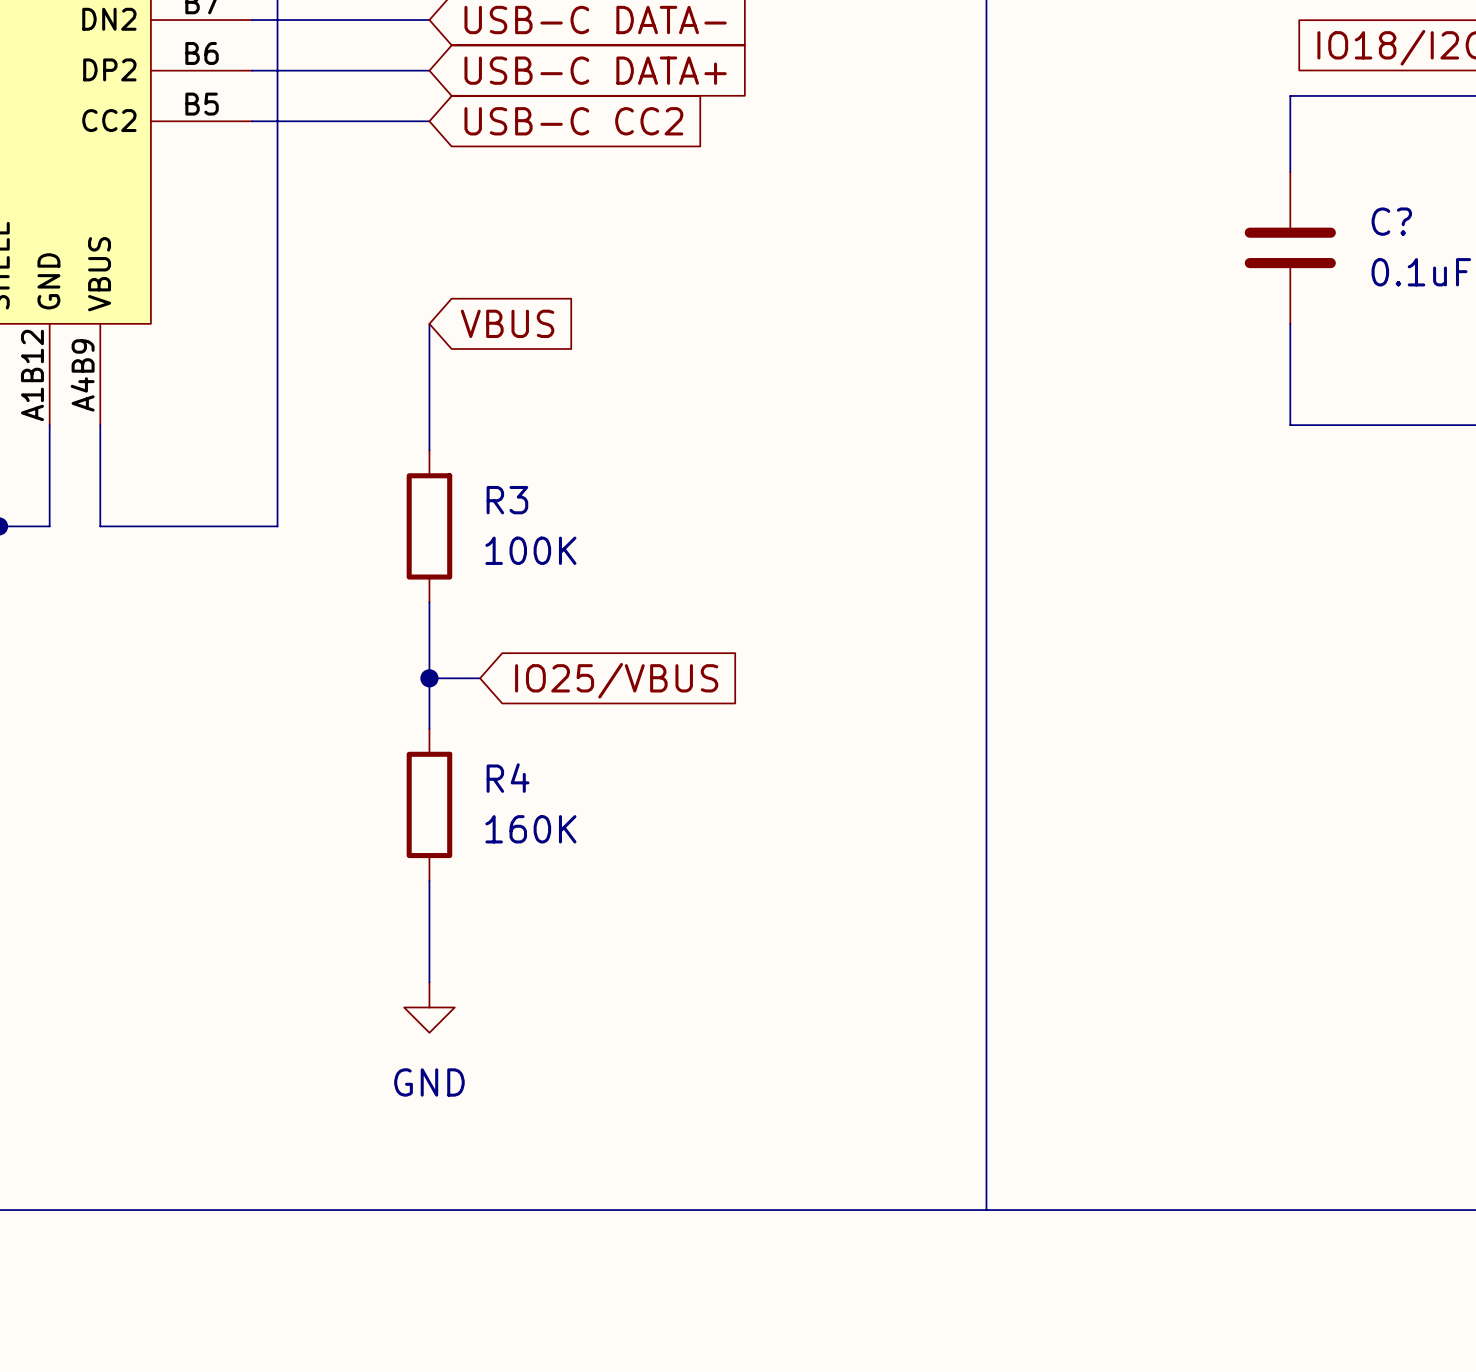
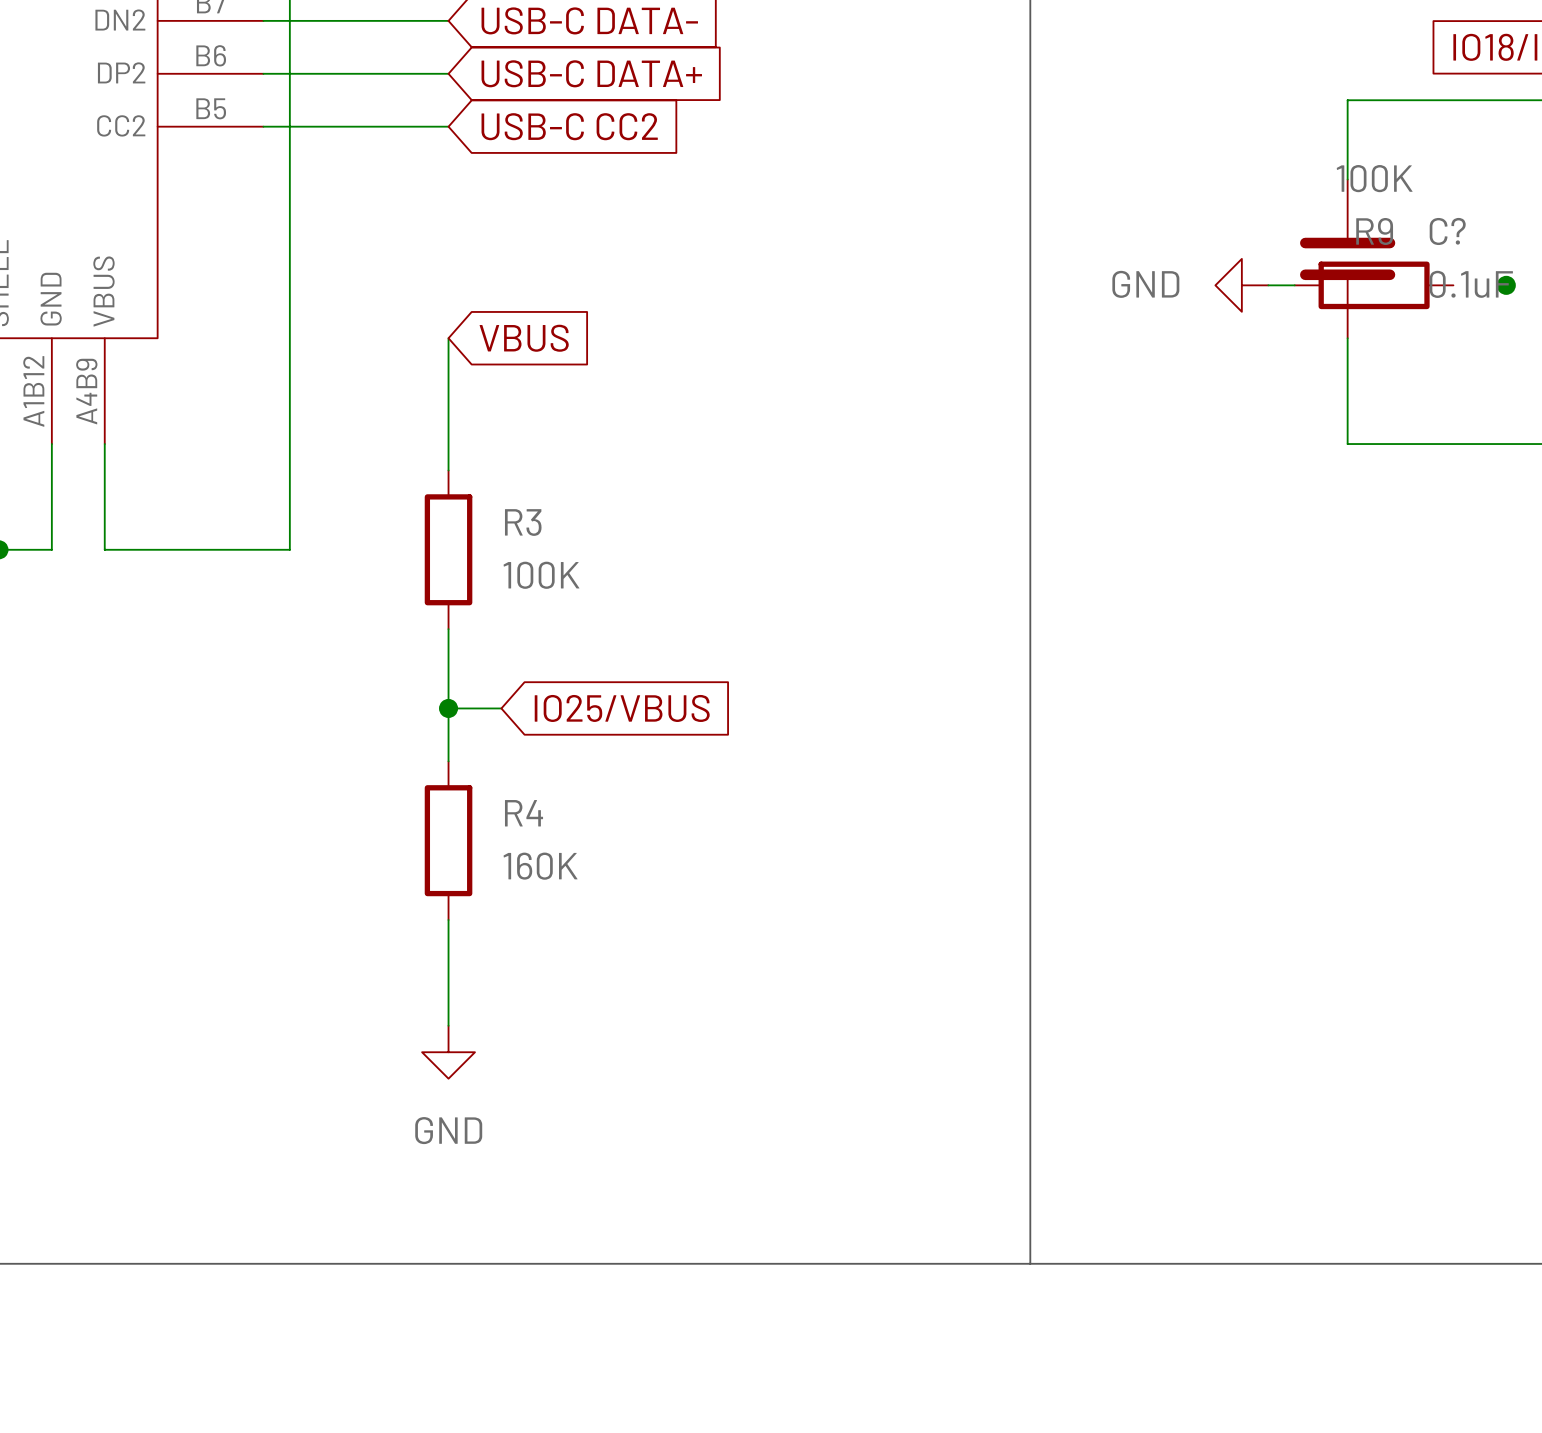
power symbol: none -> GND (1241, 285)
wire: none -> (1268, 285) (1294, 285)
R9: none -> 100K (1374, 285)
junction: none -> (1506, 285)

